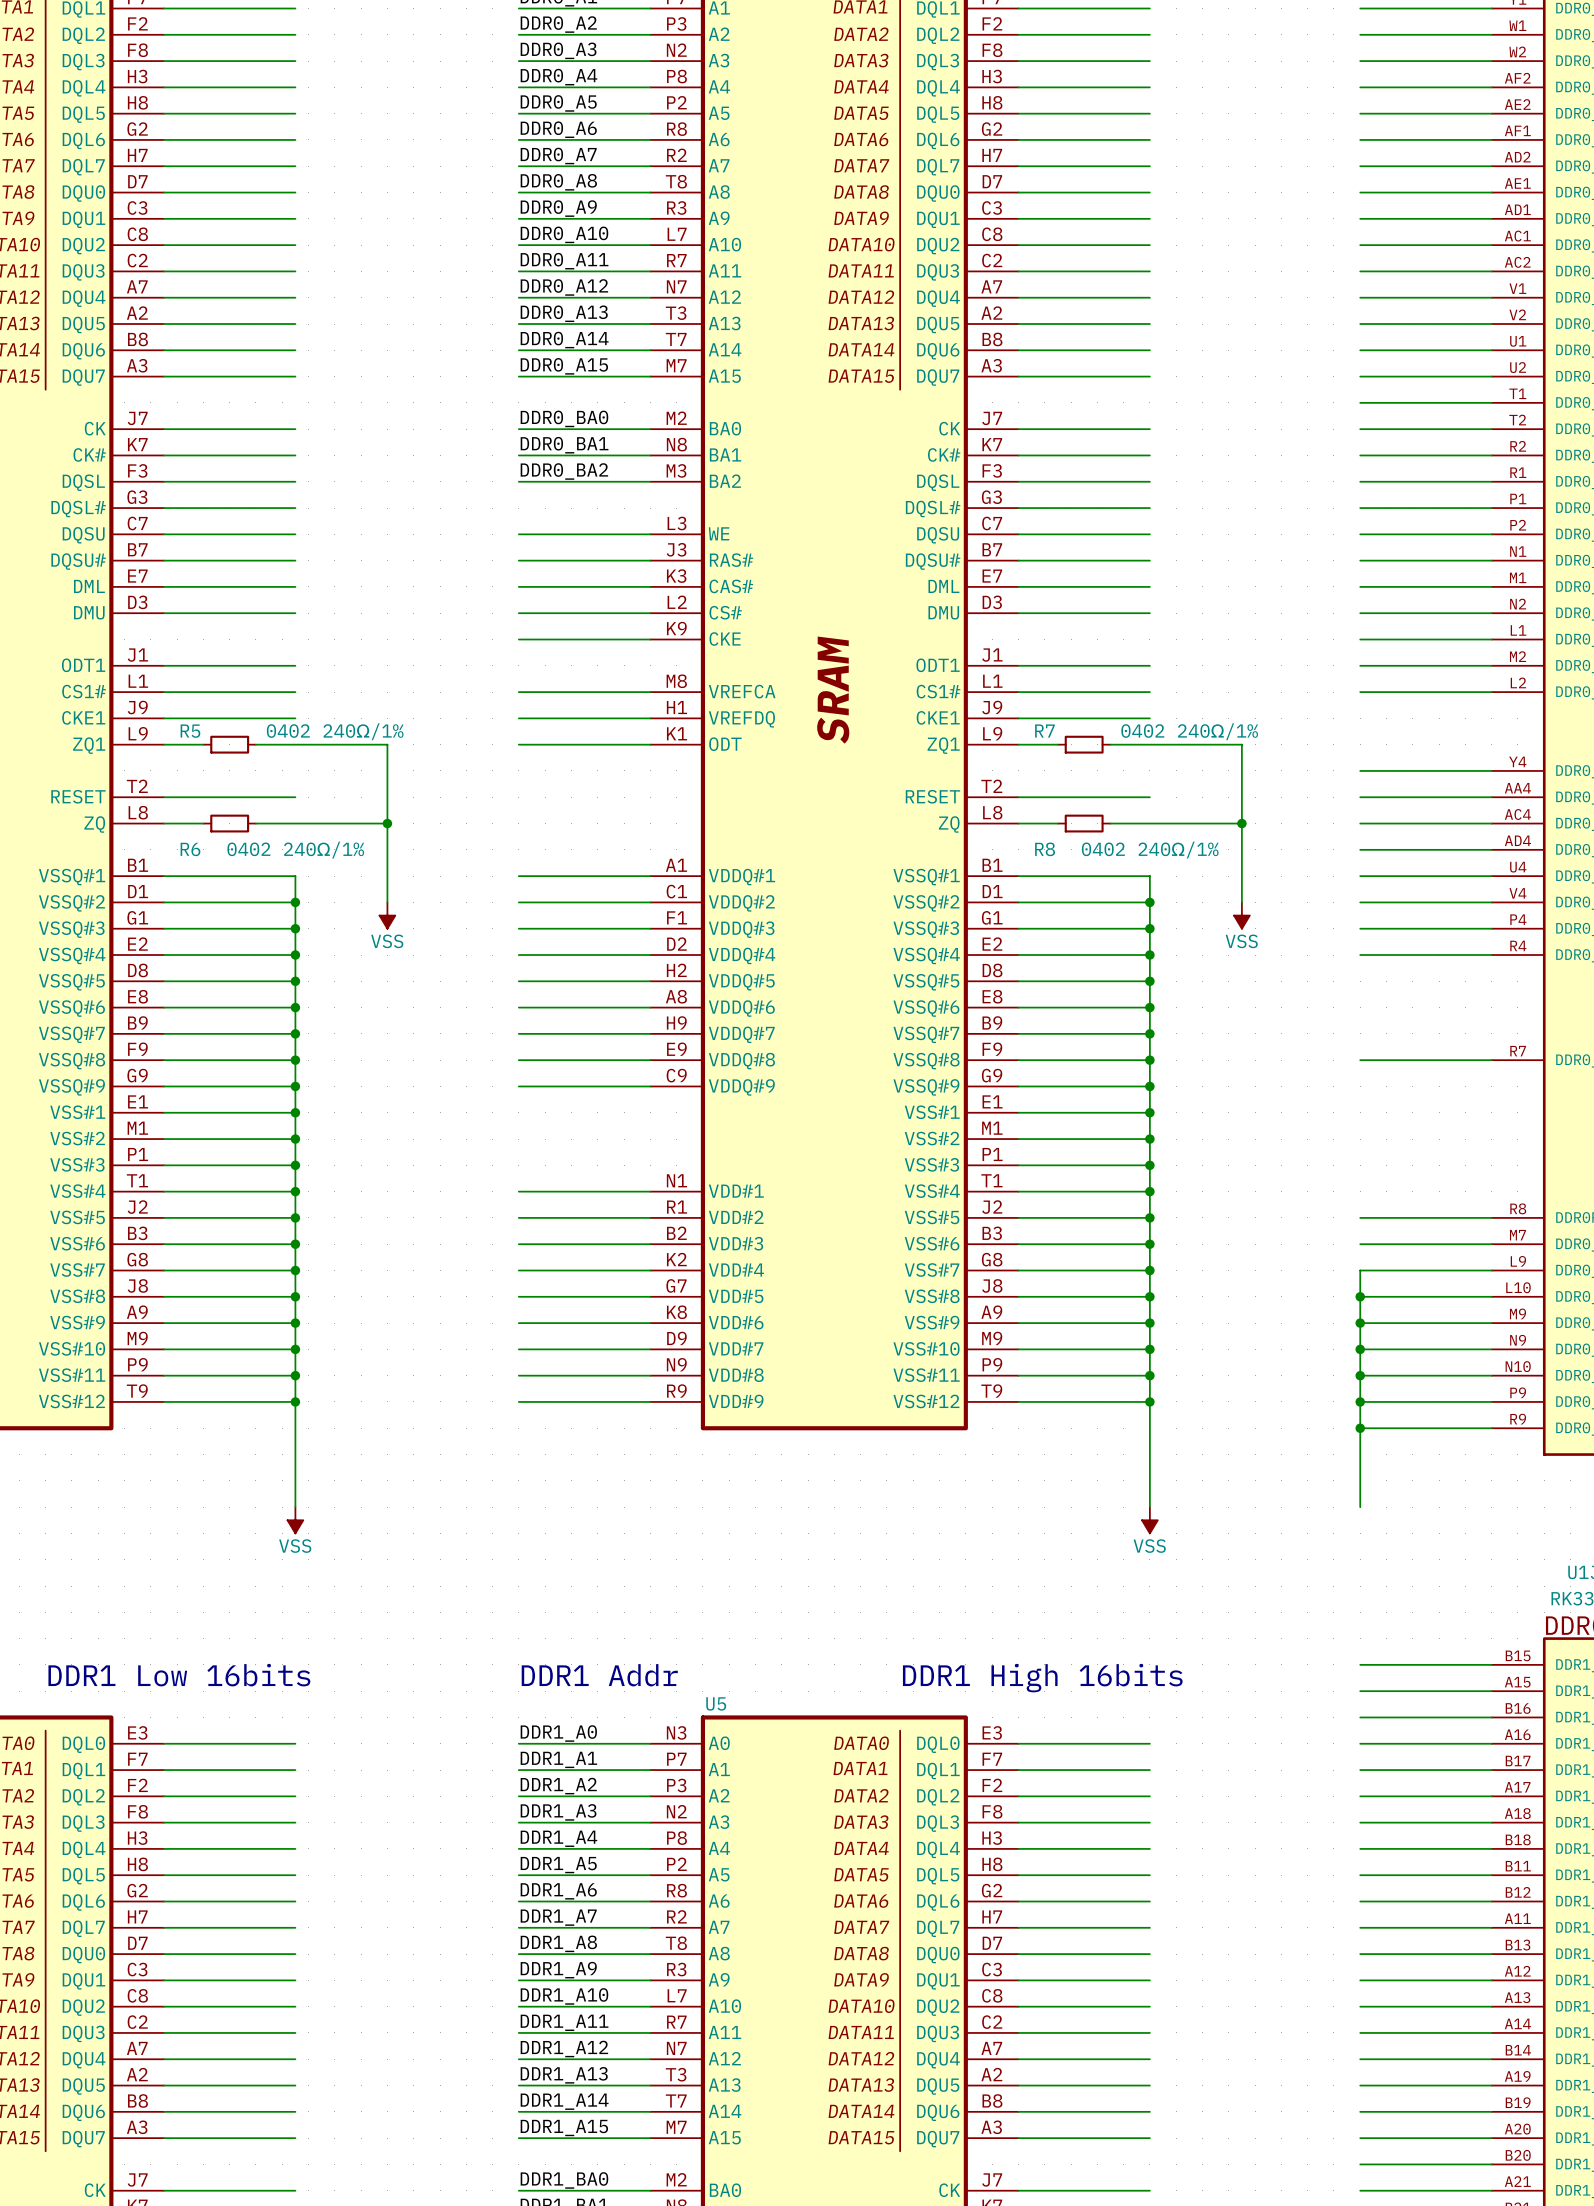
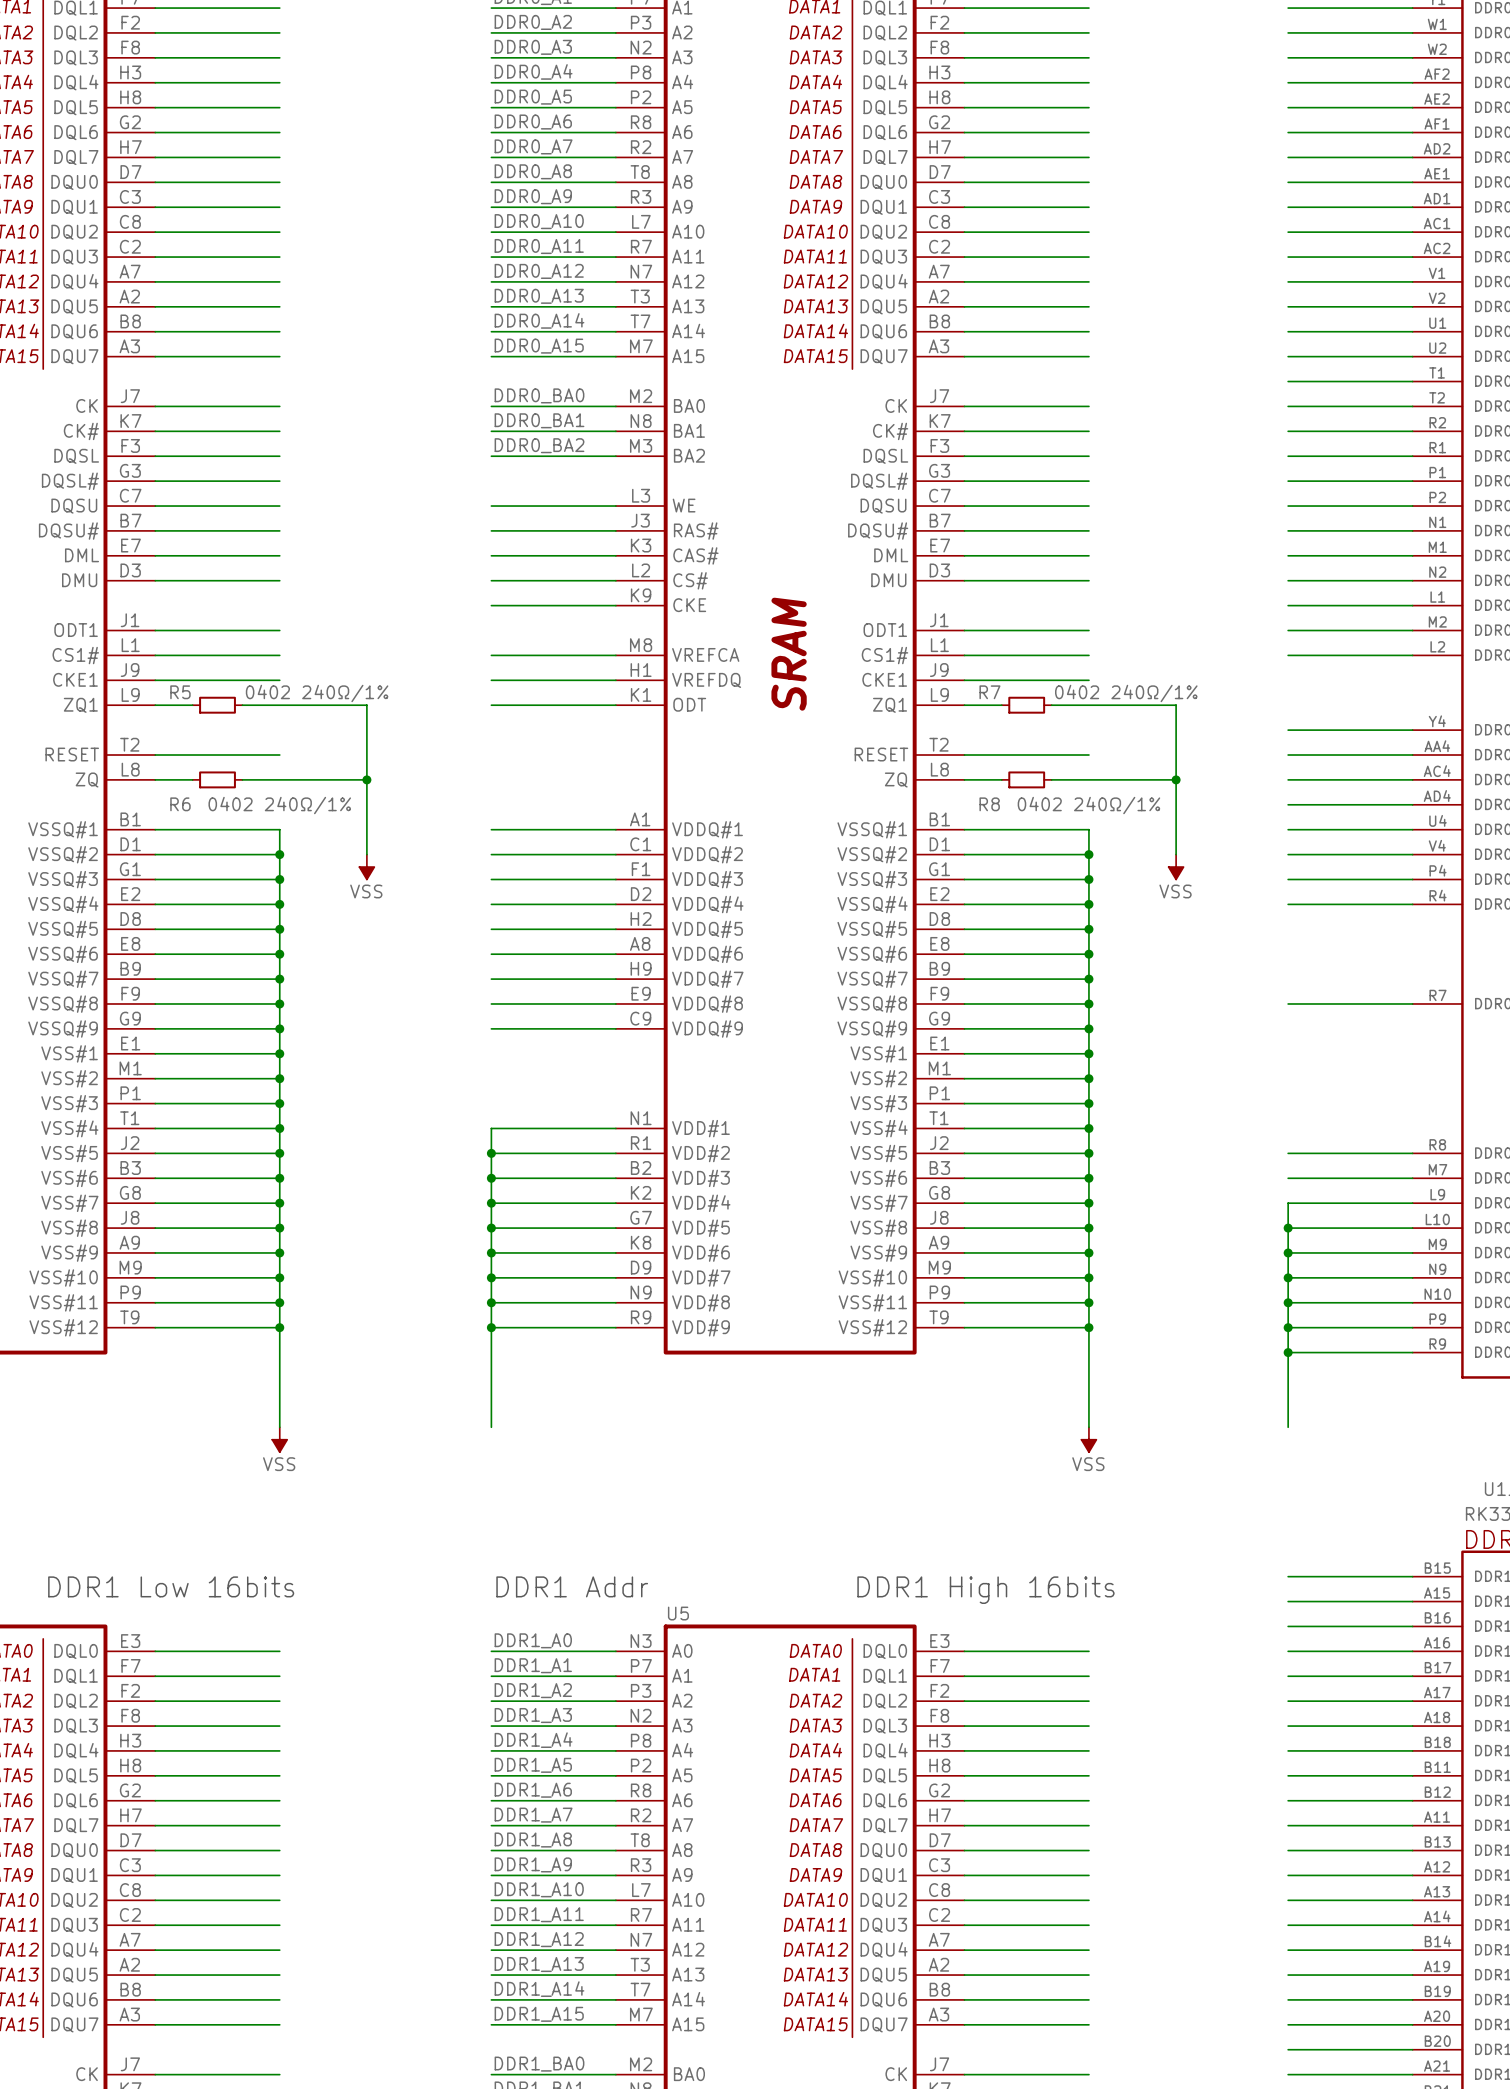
wire: none -> (491, 1128) (491, 1427)
junction: none -> (491, 1153)
junction: none -> (491, 1178)
junction: none -> (491, 1203)
junction: none -> (491, 1228)
junction: none -> (491, 1252)
junction: none -> (491, 1277)
junction: none -> (491, 1302)
junction: none -> (491, 1327)

